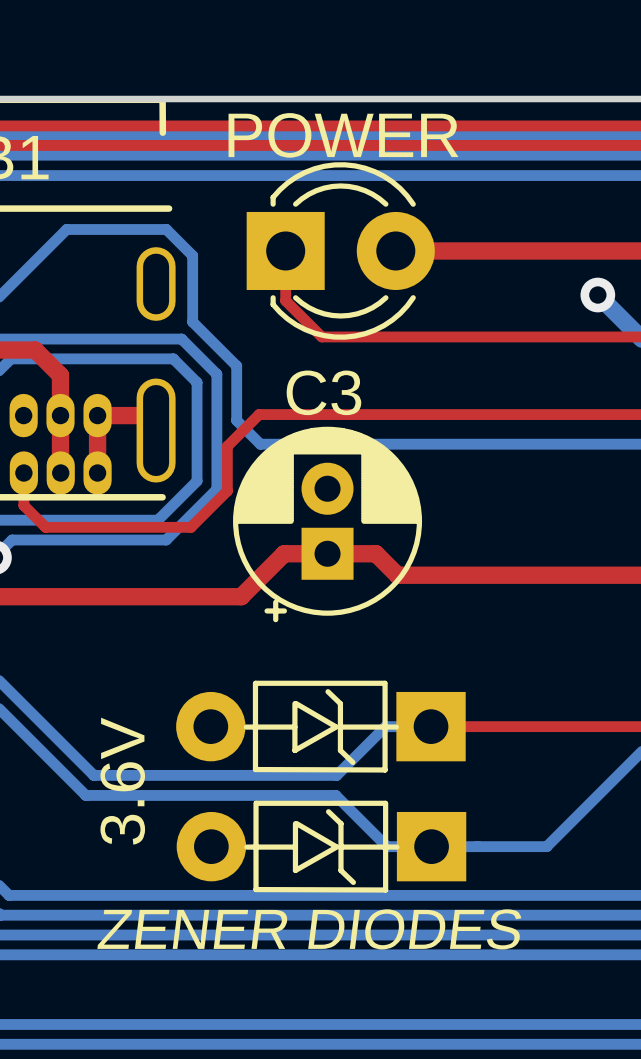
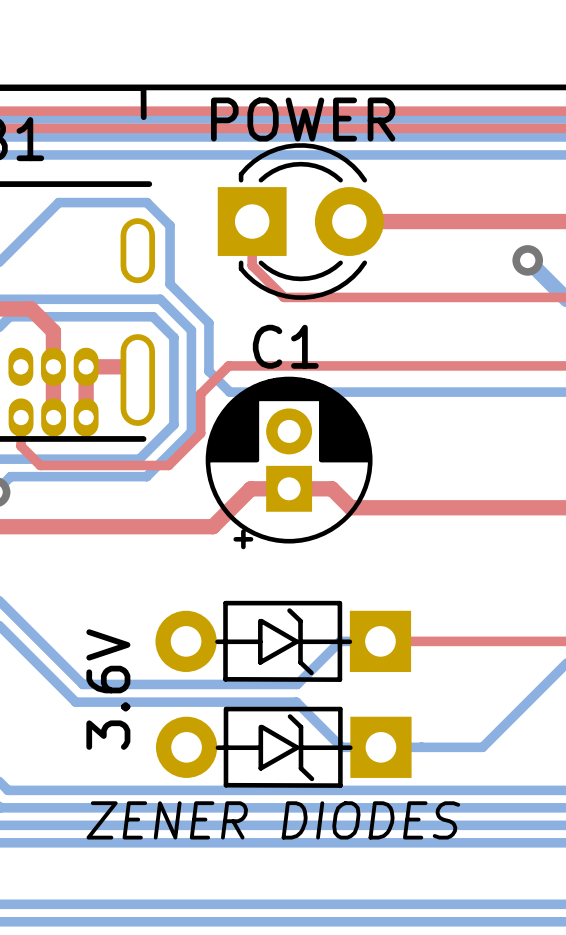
C3 name: C3 (323, 392) -> C1 (285, 346)

